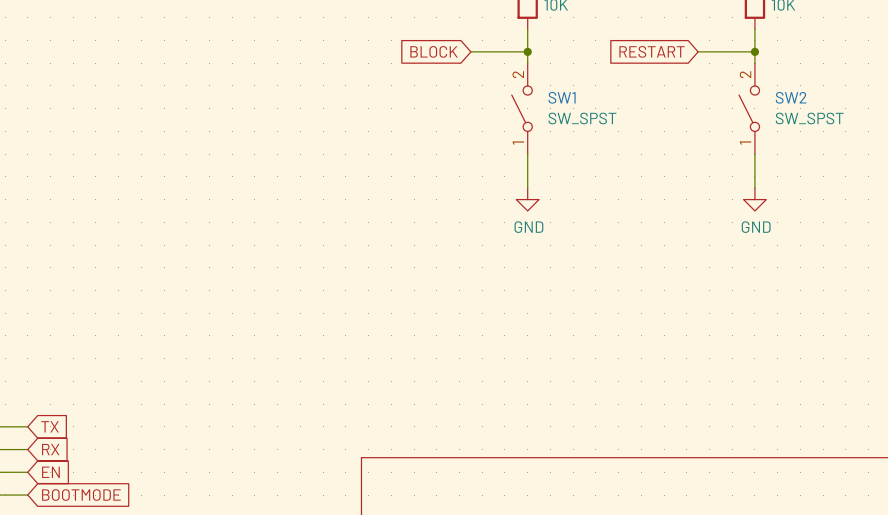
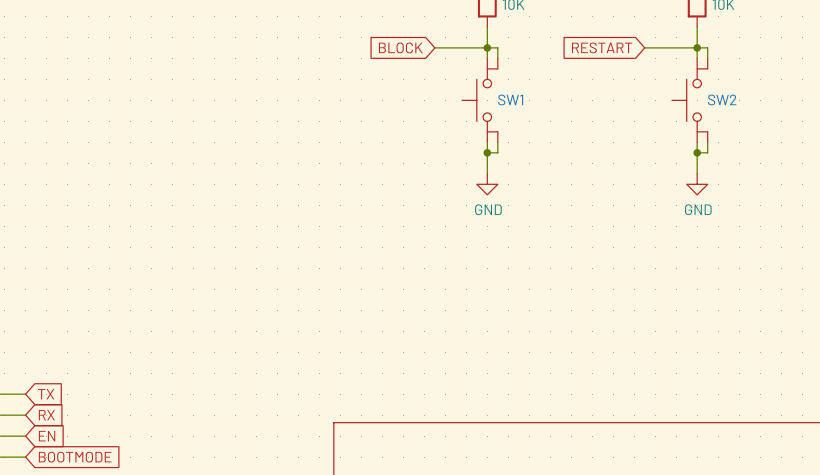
wire: none -> (487, 47) (497, 47) (497, 58)
wire: none -> (697, 47) (707, 47) (707, 58)
SW1 symbol: [511, 63, 533, 155] -> [462, 58, 498, 143]
SW2 symbol: [739, 63, 760, 155] -> [672, 58, 708, 143]
SW1 value: SW_SPST (582, 118) -> none
SW2 value: SW_SPST (809, 118) -> none
wire: none -> (497, 142) (497, 152) (487, 152)
wire: none -> (707, 142) (707, 152) (697, 152)
junction: none -> (487, 152)
junction: none -> (697, 152)

